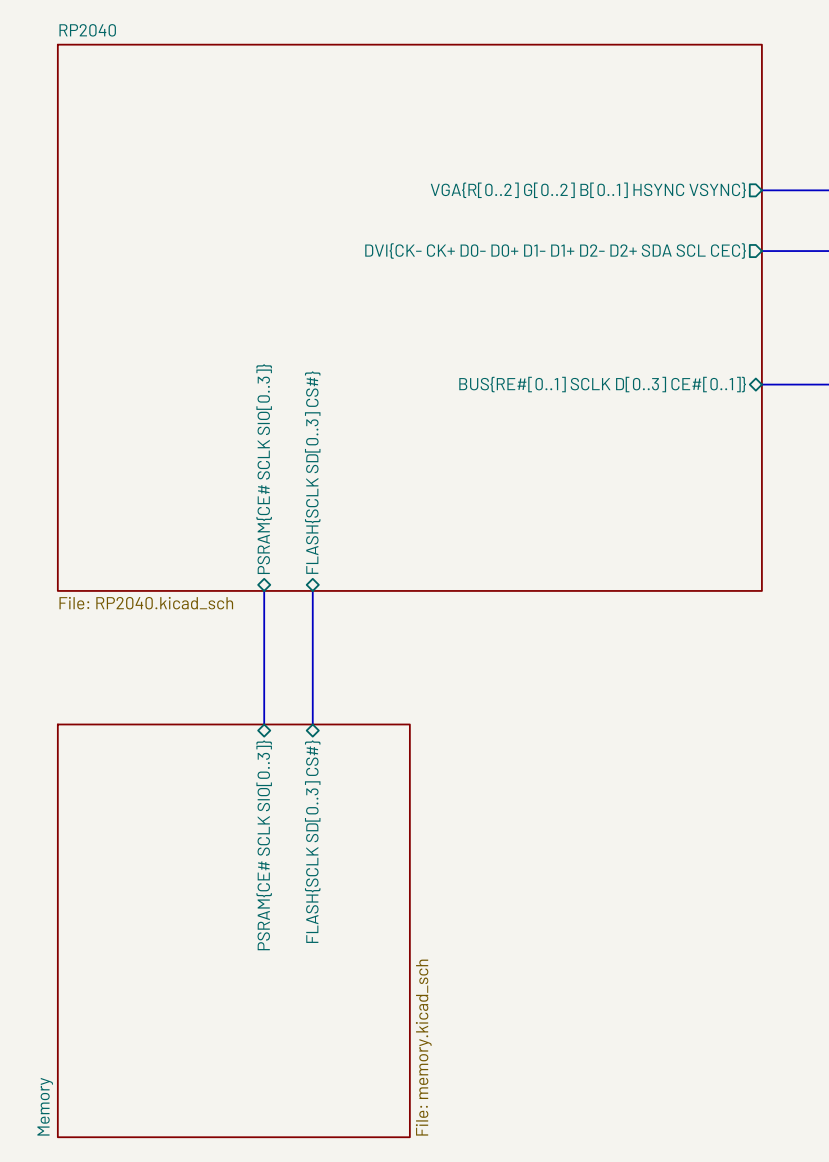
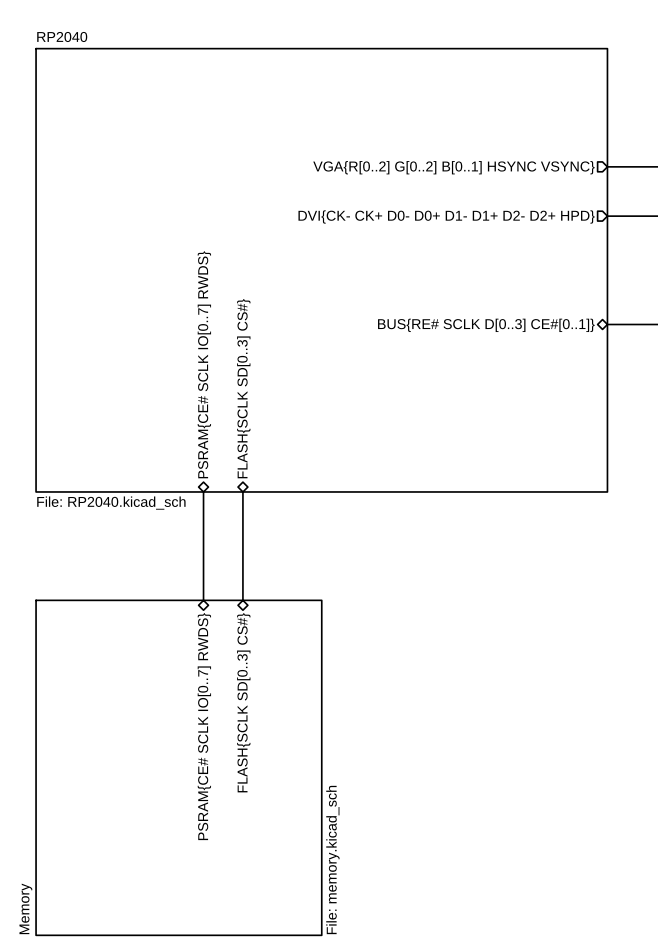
sheet pin: DVI{CK- CK+ D0- D0+ D1- D1+ D2- D2+ SDA SCL CEC} (555, 250) -> DVI{CK- CK+ D0- D0+ D1- D1+ D2- D2+ HPD} (446, 216)
sheet pin: BUS{RE#[0..1] SCLK D[0..3] CE#[0..1]} (602, 384) -> BUS{RE# SCLK D[0..3] CE#[0..1]} (486, 325)
sheet pin: PSRAM{CE# SCLK SIO[0..3]} (264, 469) -> PSRAM{CE# SCLK IO[0..7] RWDS} (204, 364)
sheet pin: PSRAM{CE# SCLK SIO[0..3]} (264, 845) -> PSRAM{CE# SCLK IO[0..7] RWDS} (204, 726)

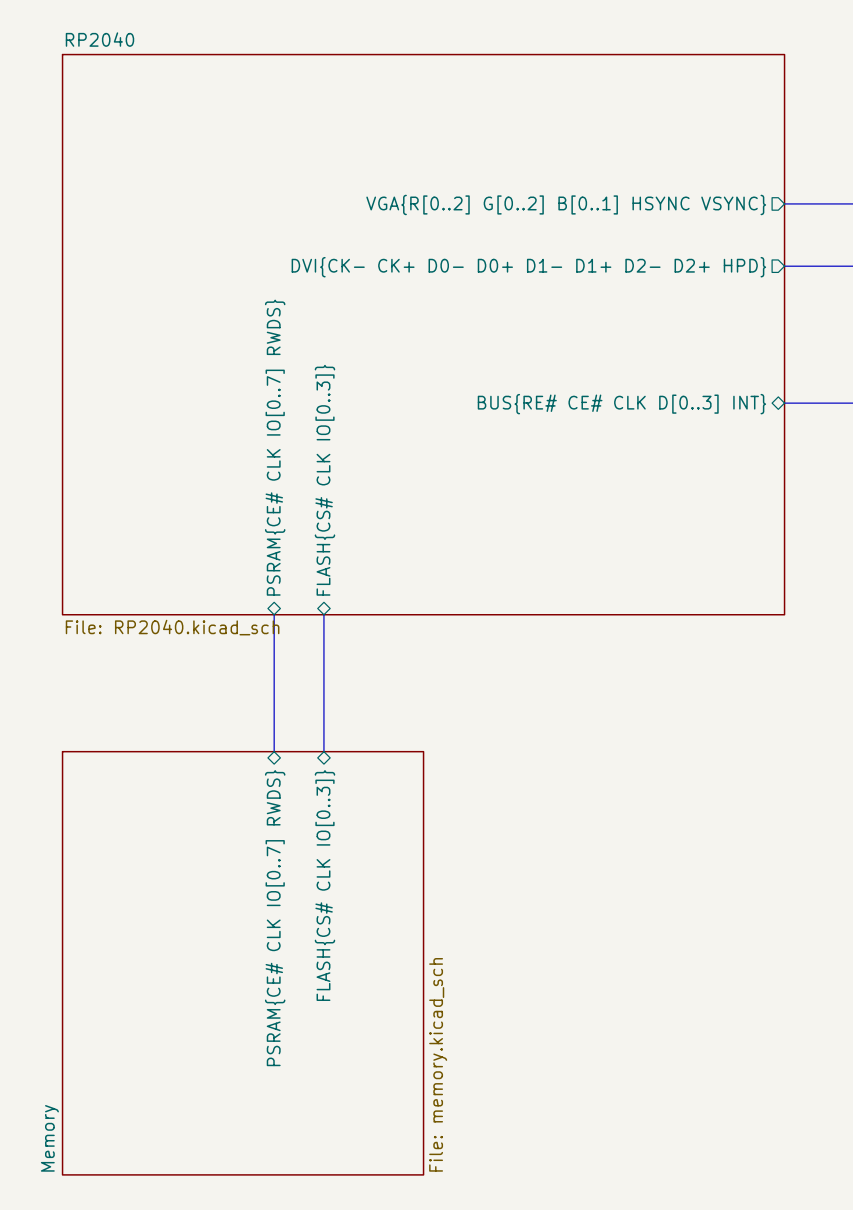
sheet pin: BUS{RE# SCLK D[0..3] CE#[0..1]} (486, 325) -> BUS{RE# CE# CLK D[0..3] INT} (621, 404)
sheet pin: PSRAM{CE# SCLK IO[0..7] RWDS} (204, 364) -> PSRAM{CE# CLK IO[0..7] RWDS} (275, 447)
sheet pin: FLASH{SCLK SD[0..3] CS#} (243, 388) -> FLASH{CS# CLK IO[0..3]} (324, 480)
sheet pin: FLASH{SCLK SD[0..3] CS#} (243, 702) -> FLASH{CS# CLK IO[0..3]} (324, 885)
sheet pin: PSRAM{CE# SCLK IO[0..7] RWDS} (204, 726) -> PSRAM{CE# CLK IO[0..7] RWDS} (275, 918)

